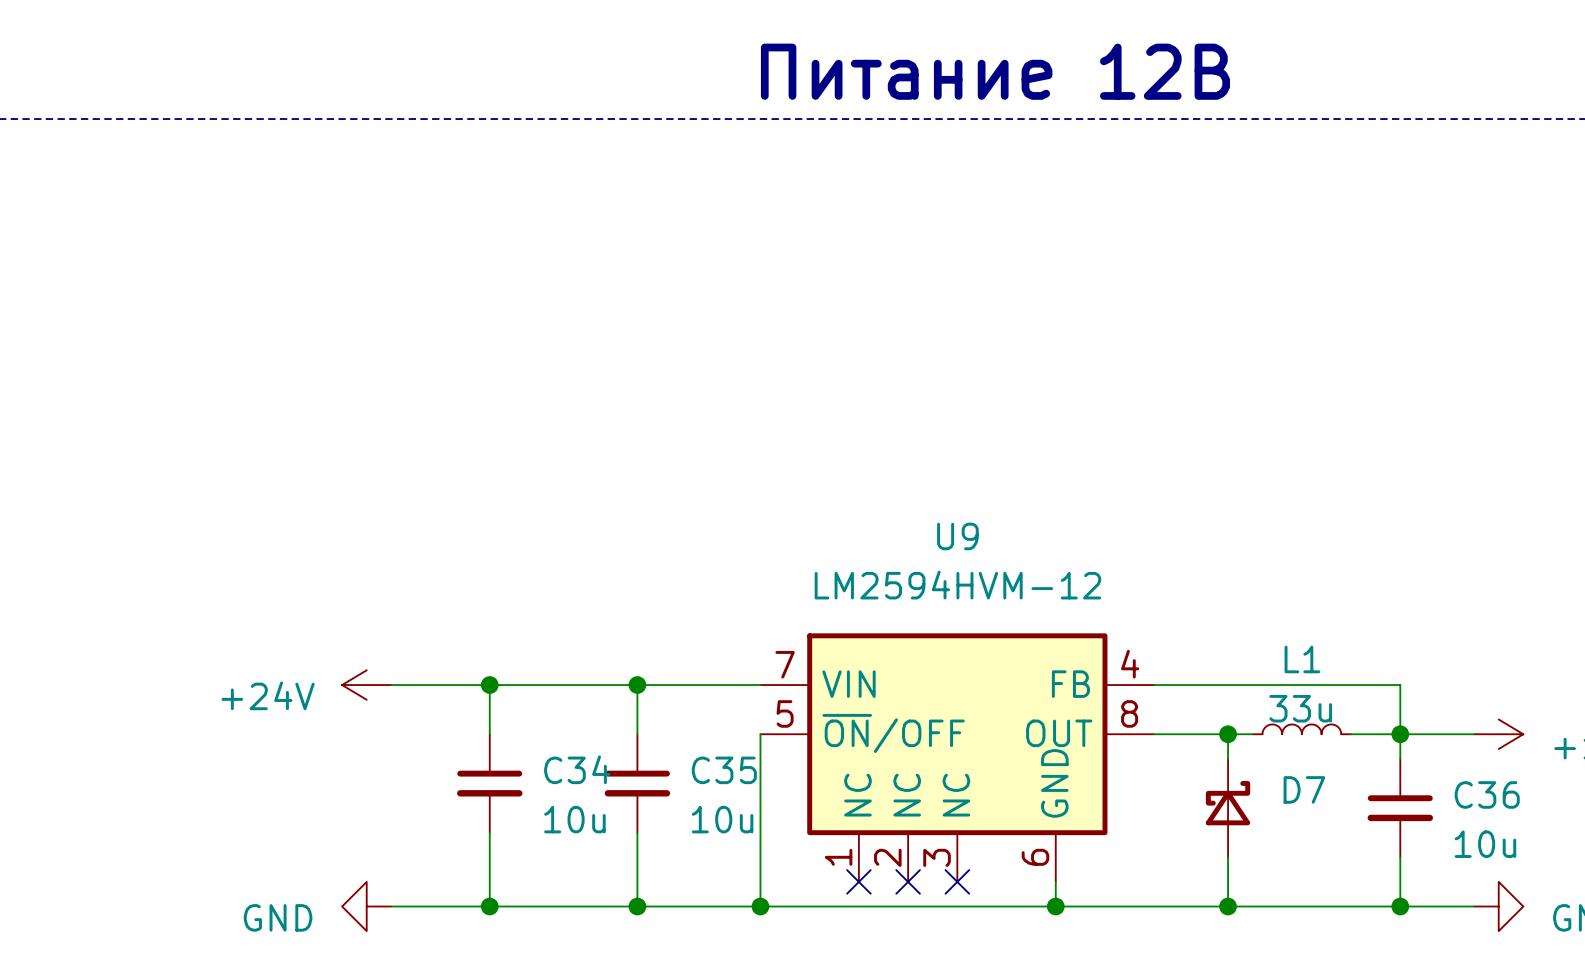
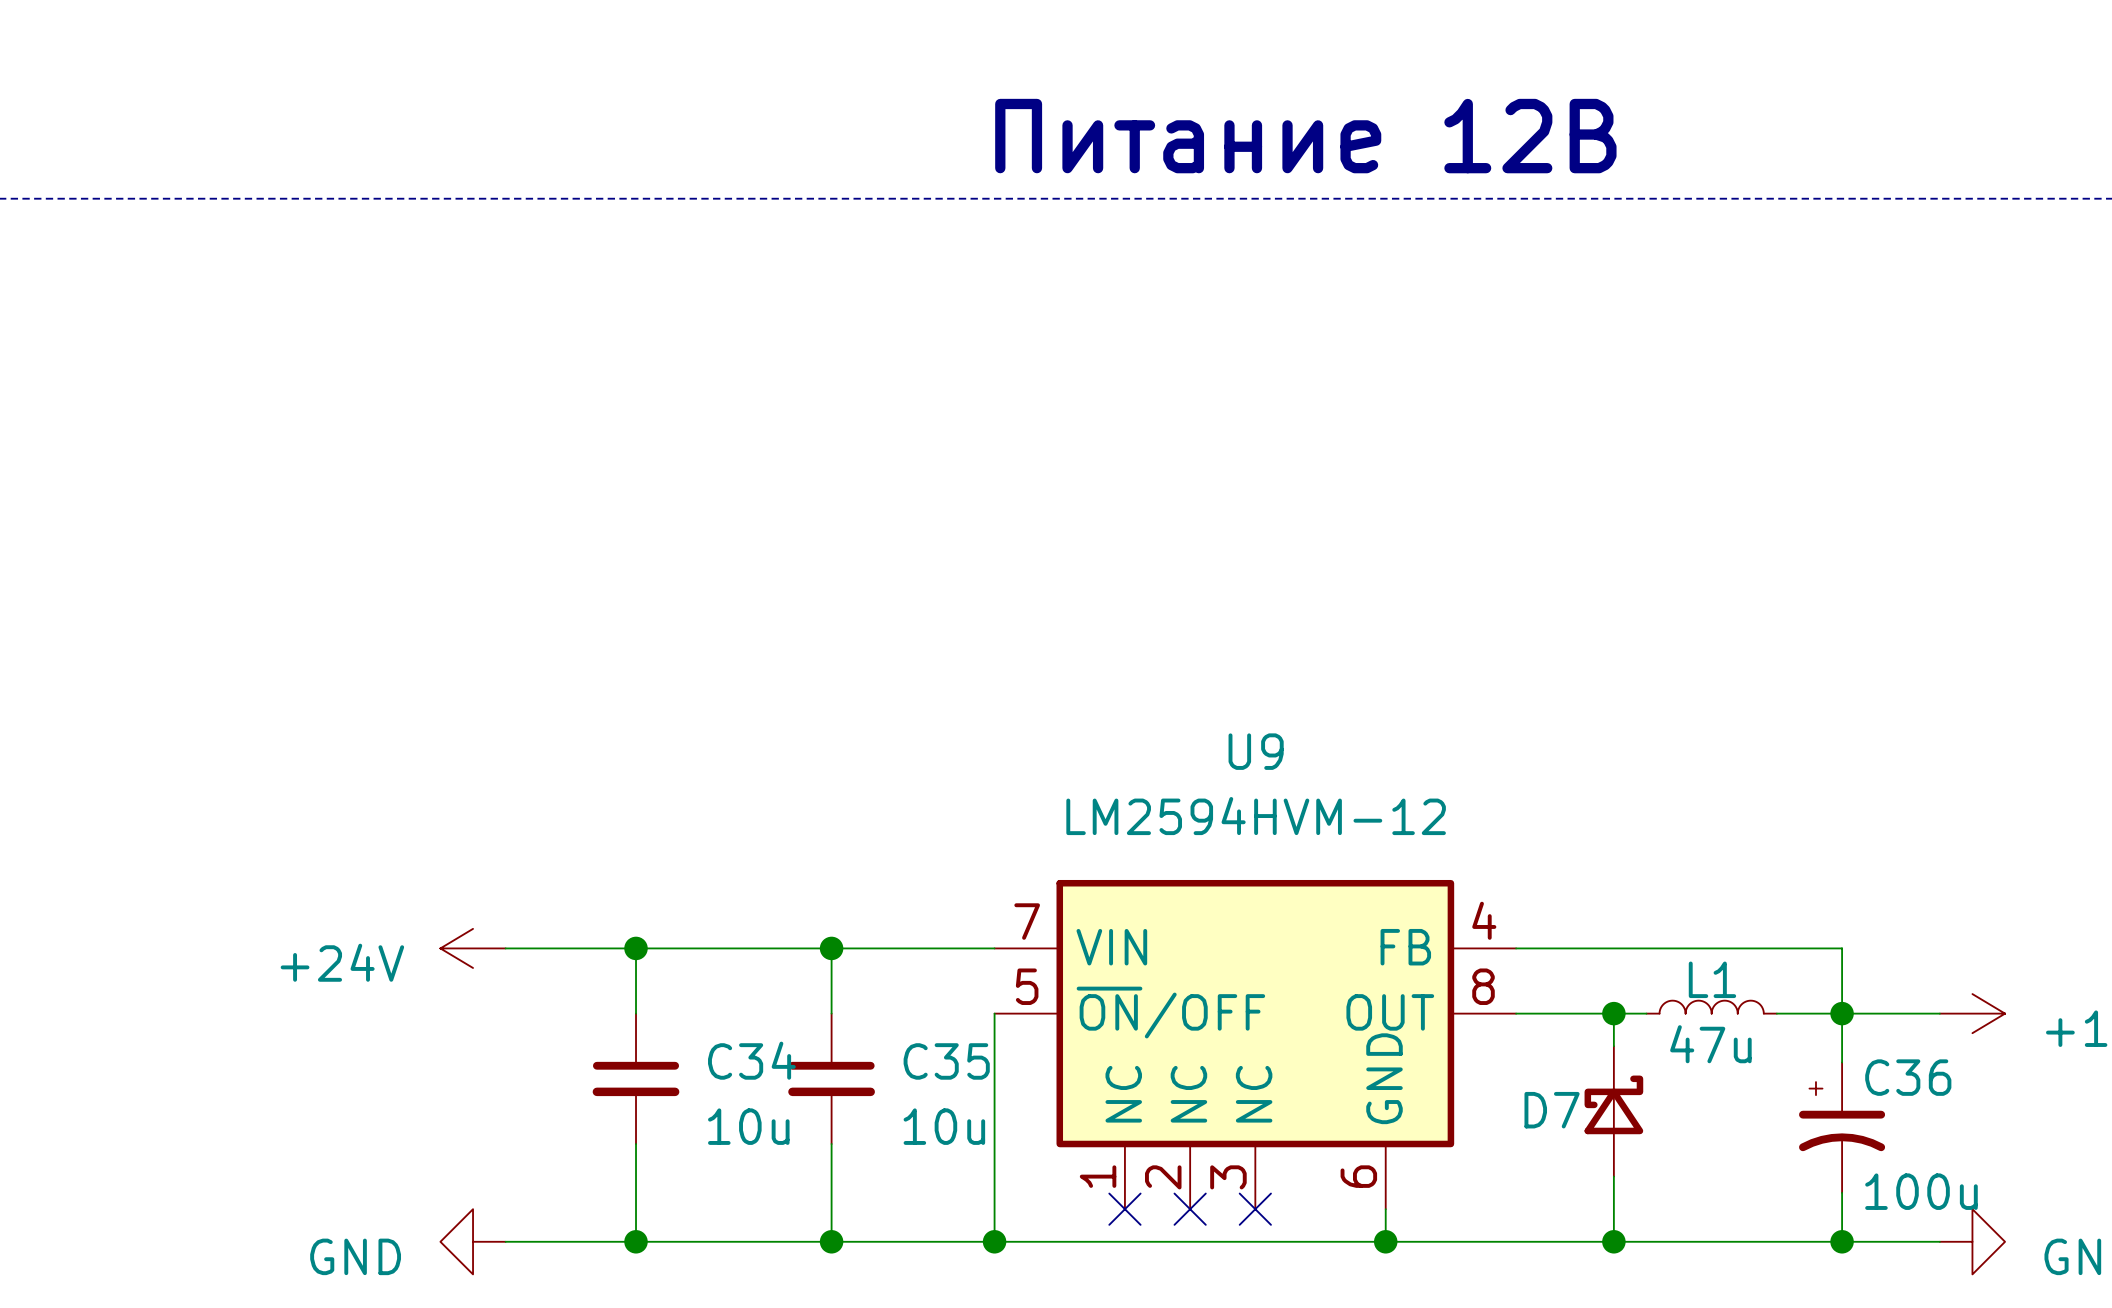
L1 name position: L1 (1302, 659) -> L1 (1712, 979)
L1 value: 33u (1300, 708) -> 47u (1710, 1044)
C36 symbol: [1367, 758, 1434, 858] -> [1799, 1062, 1886, 1193]
D7 name position: D7 (1304, 789) -> D7 (1552, 1110)
C36 name position: C36 (1487, 794) -> C36 (1908, 1077)
C36 value: 10u (1485, 844) -> 100u (1921, 1191)

